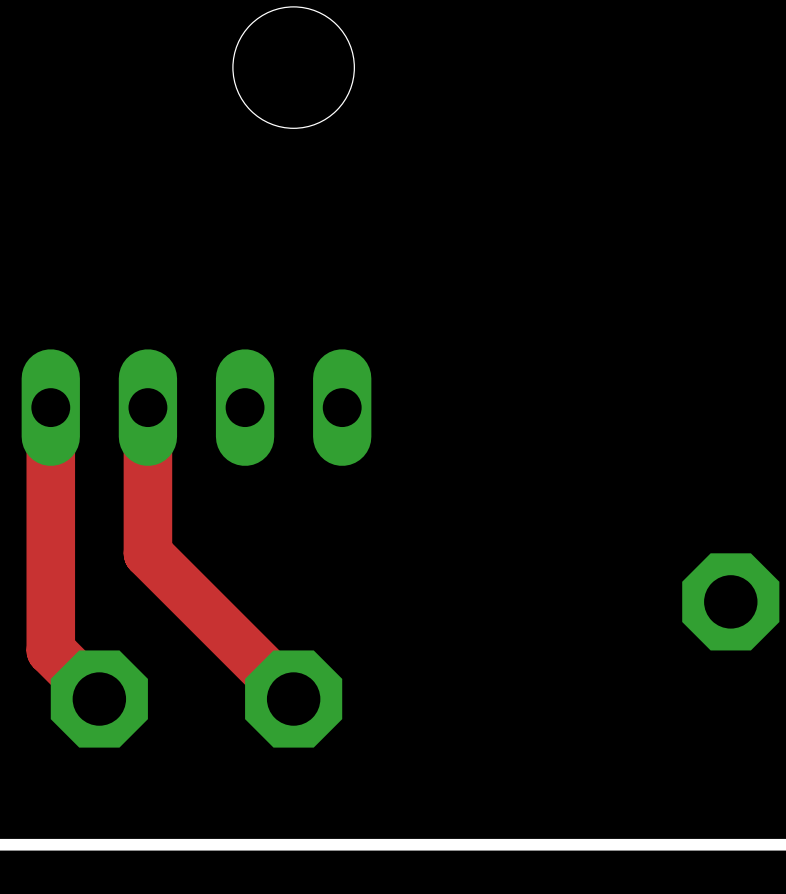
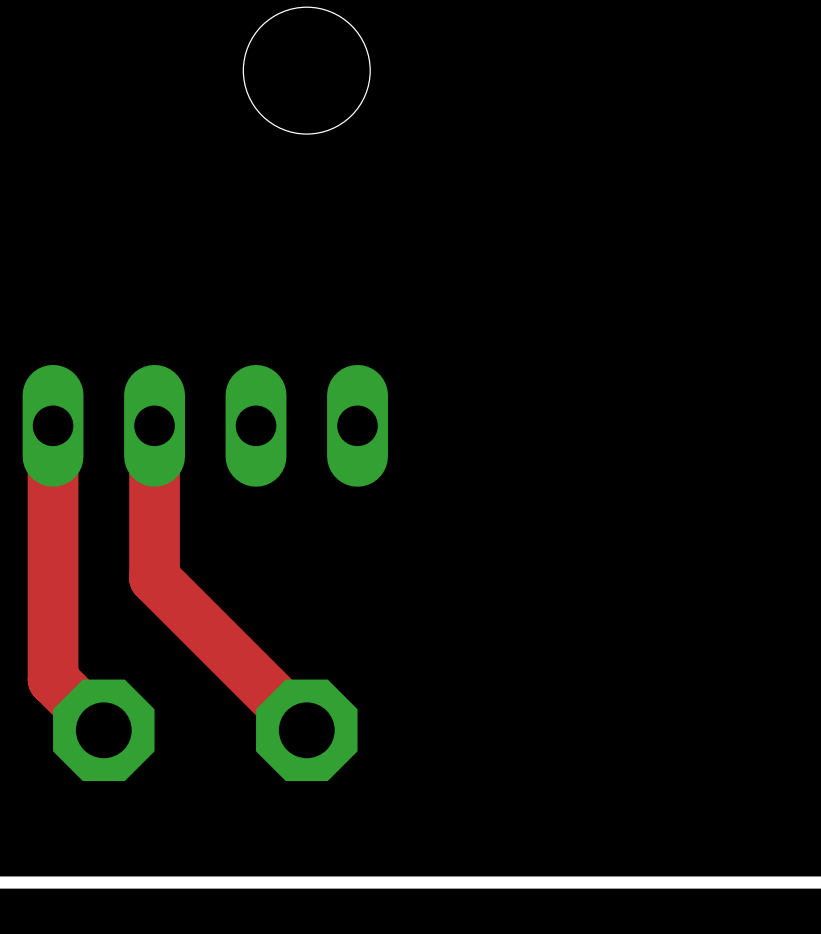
part: (730, 601) -> none

